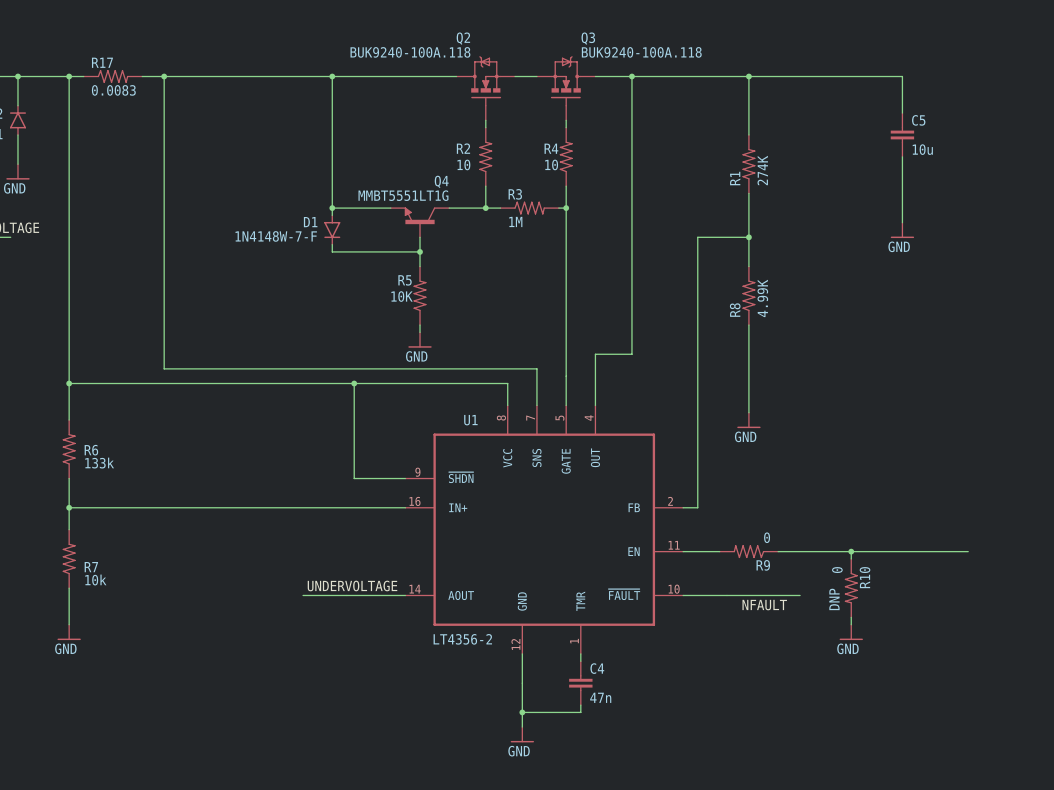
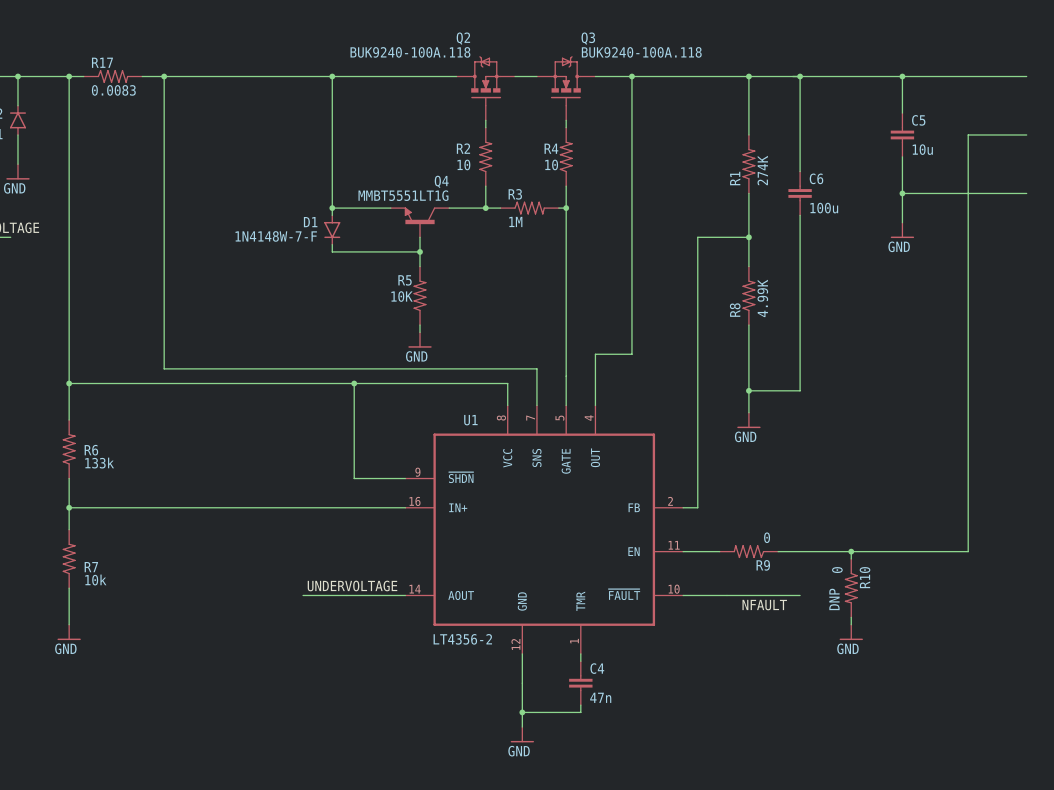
wire: none -> (800, 76) (800, 171)
junction: none -> (800, 76)
wire: none -> (902, 76) (1026, 76)
junction: none -> (902, 76)
wire: none -> (1026, 134) (968, 134) (968, 551)
C6: none -> 100u (800, 193)
wire: none -> (902, 193) (1026, 193)
junction: none -> (902, 193)
wire: none -> (800, 215) (800, 390) (748, 390)
junction: none -> (748, 390)

